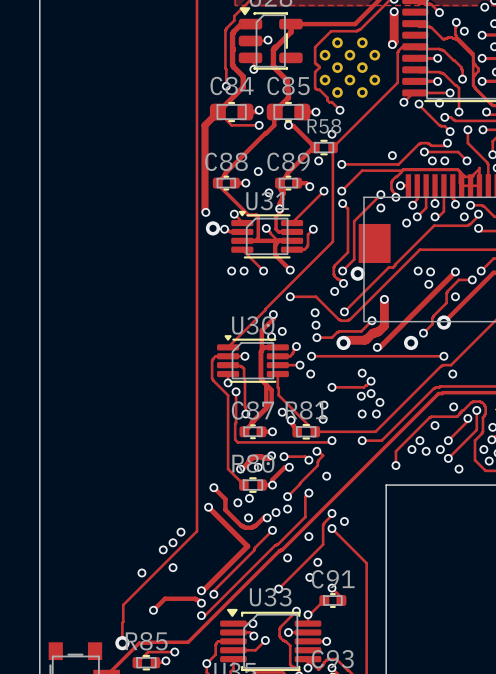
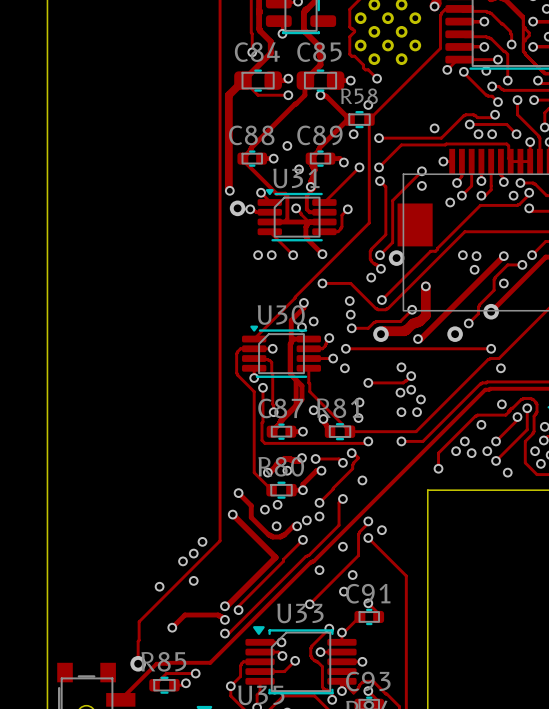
track: (479, 168) (472, 176) (465, 176) (459, 171) -> none
track: (402, 170) (391, 182) (391, 189) (395, 197) -> none
via position: (395, 197) -> (530, 142)

